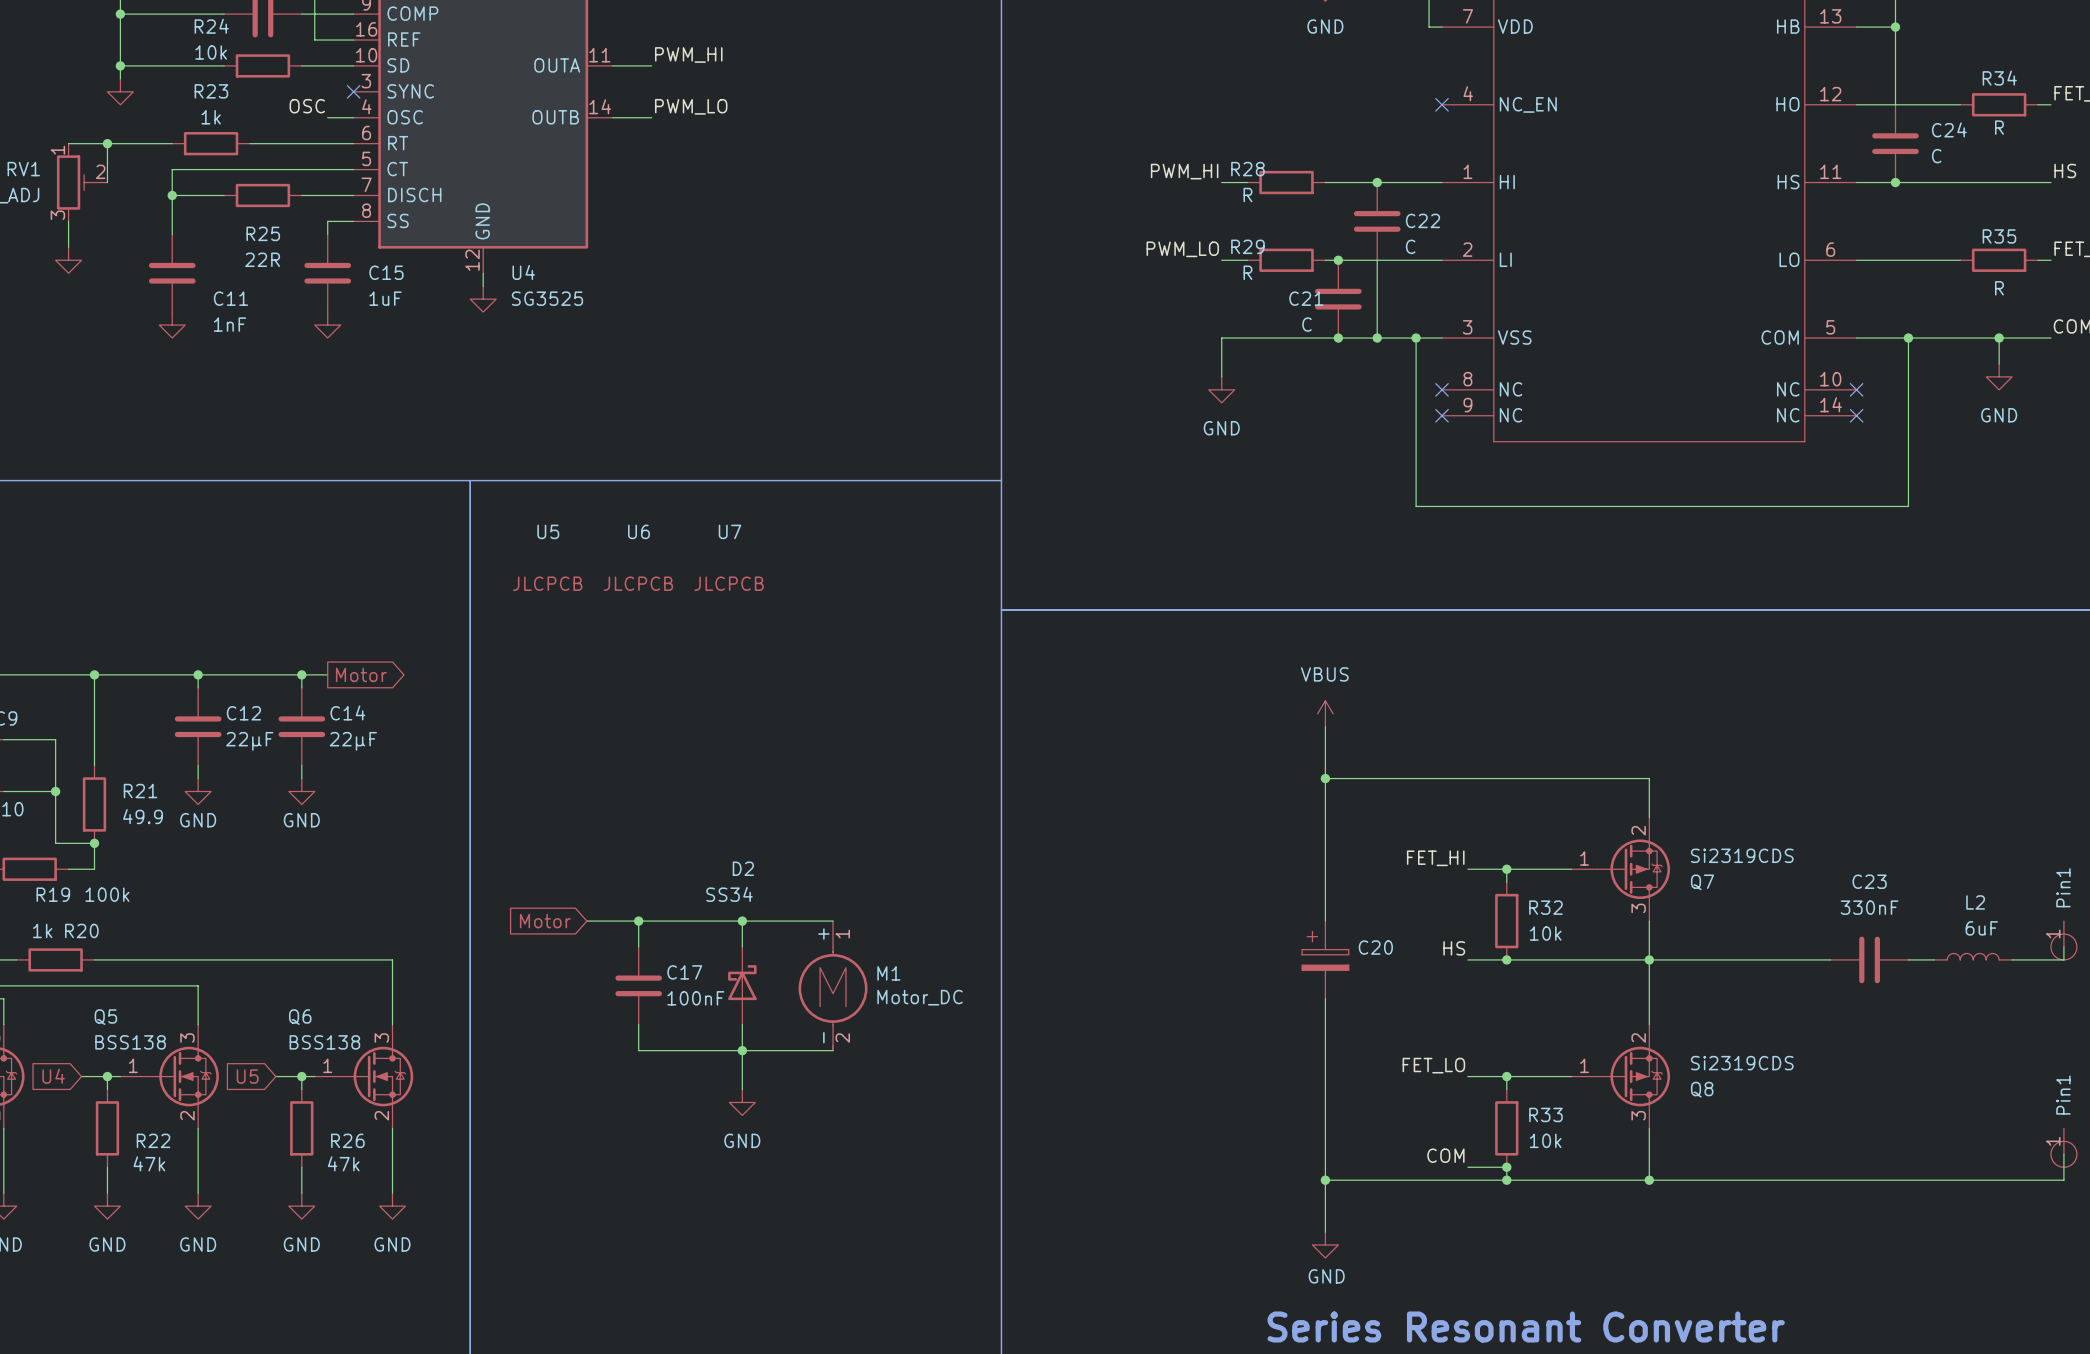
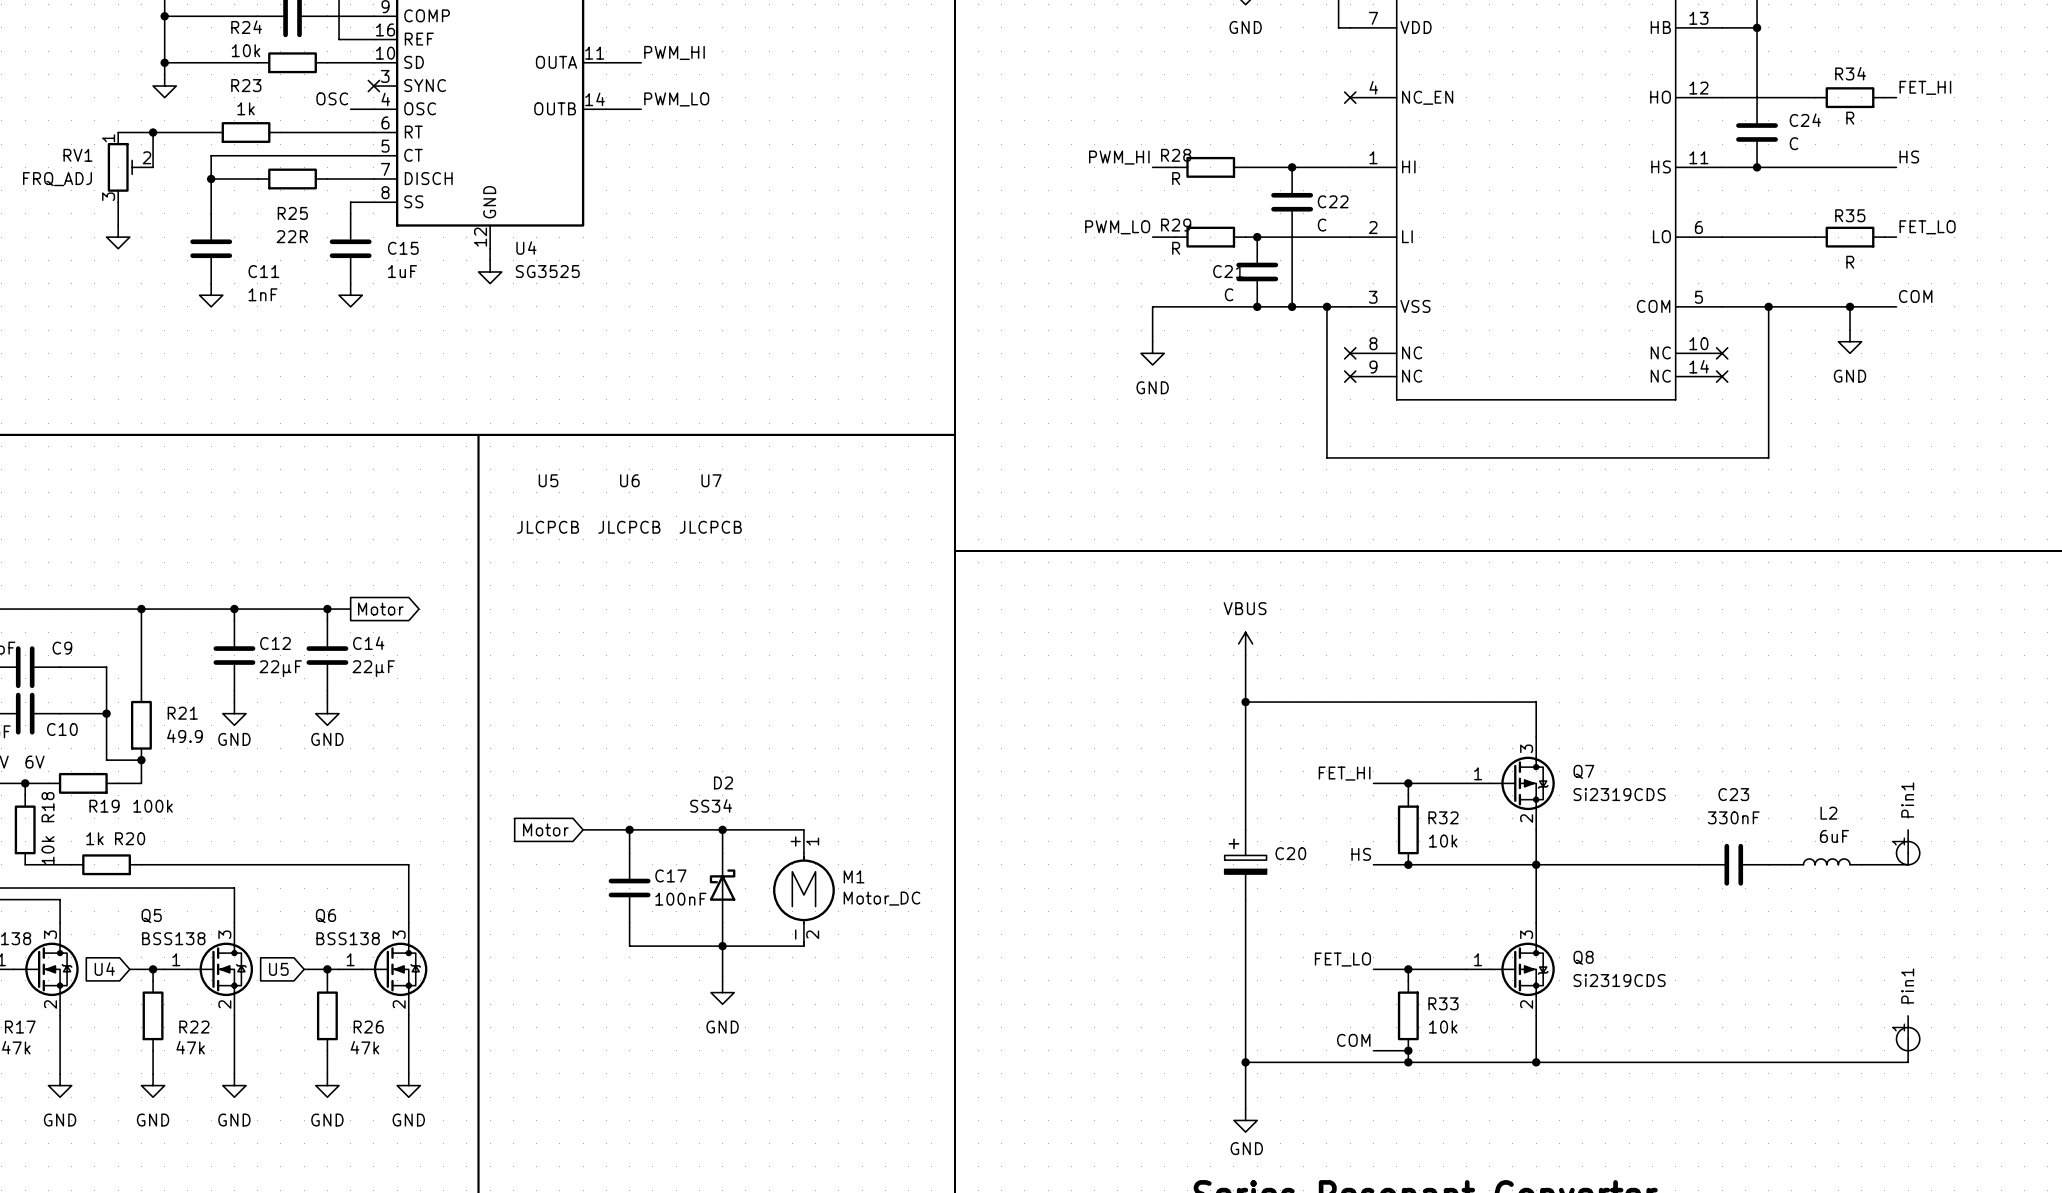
Q7 flip: as is (1633, 869) -> up-down (1522, 783)
Q8 flip: as is (1633, 1076) -> up-down (1522, 969)

